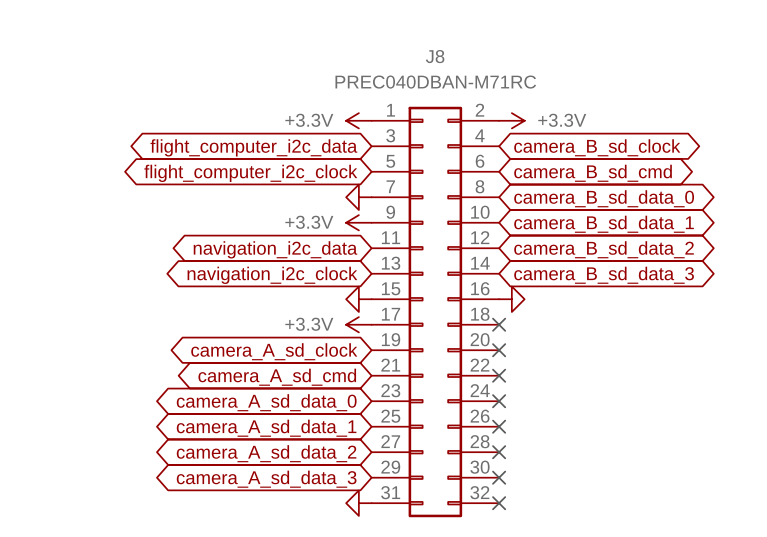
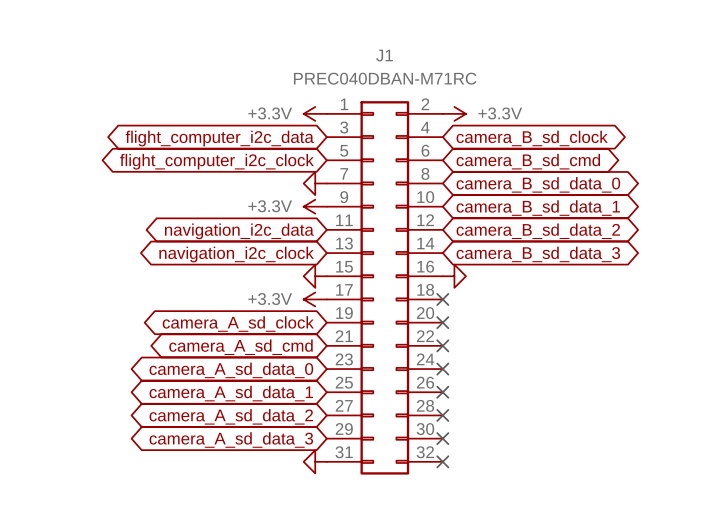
J8 name: J8 (435, 56) -> J1 (384, 55)

